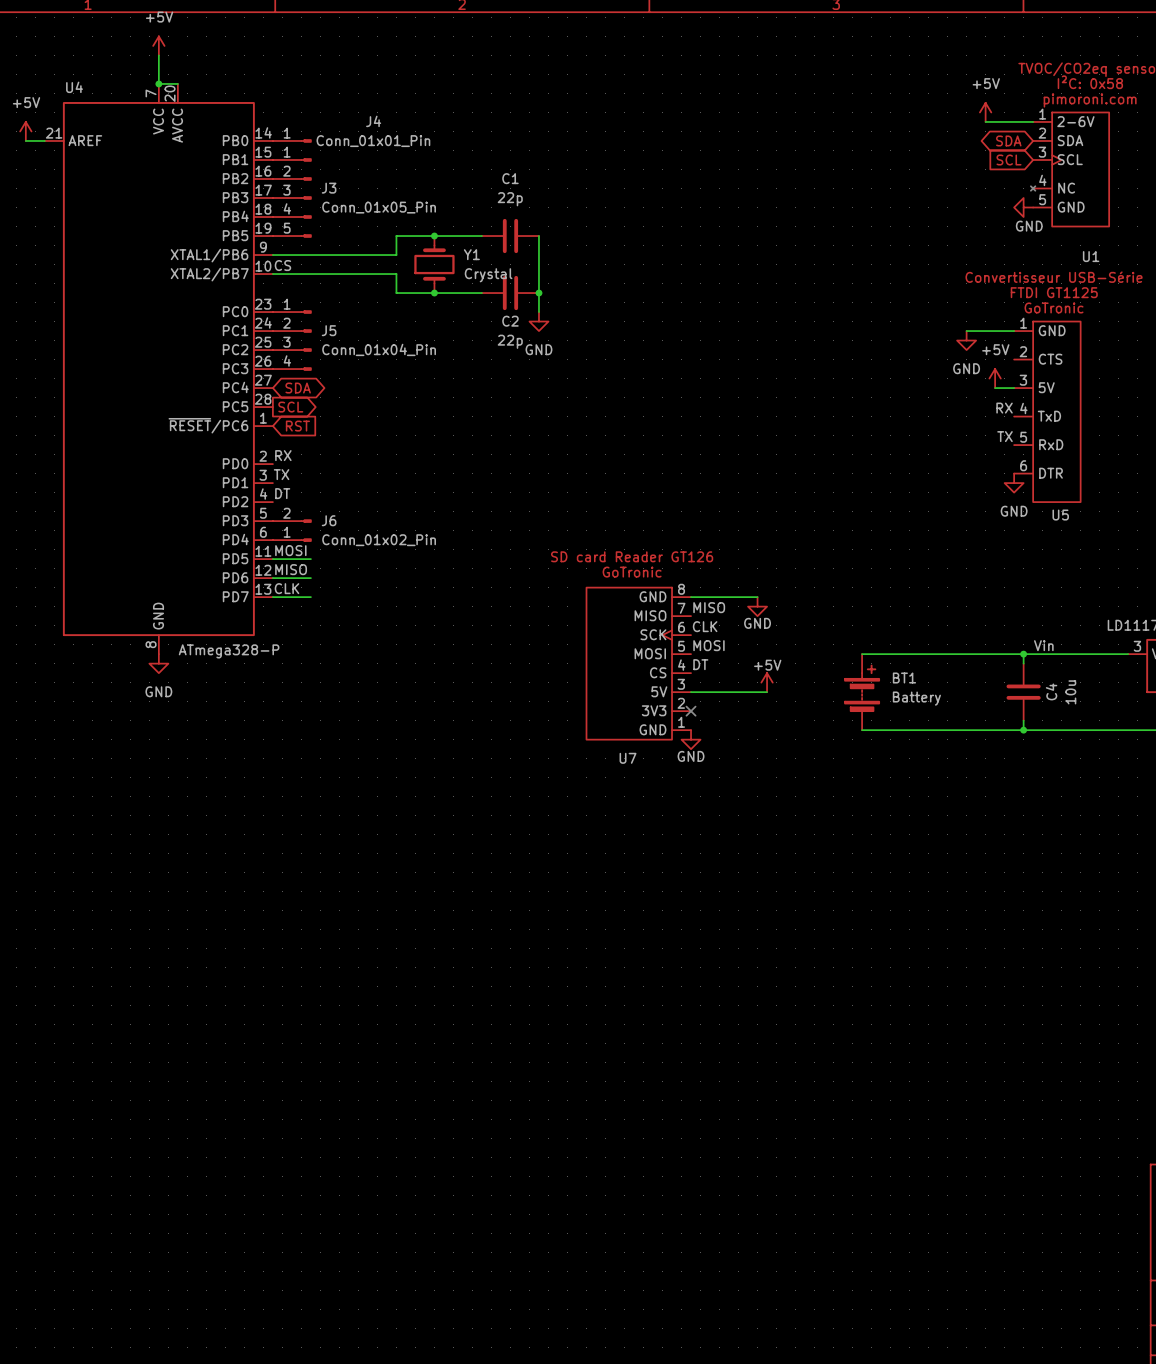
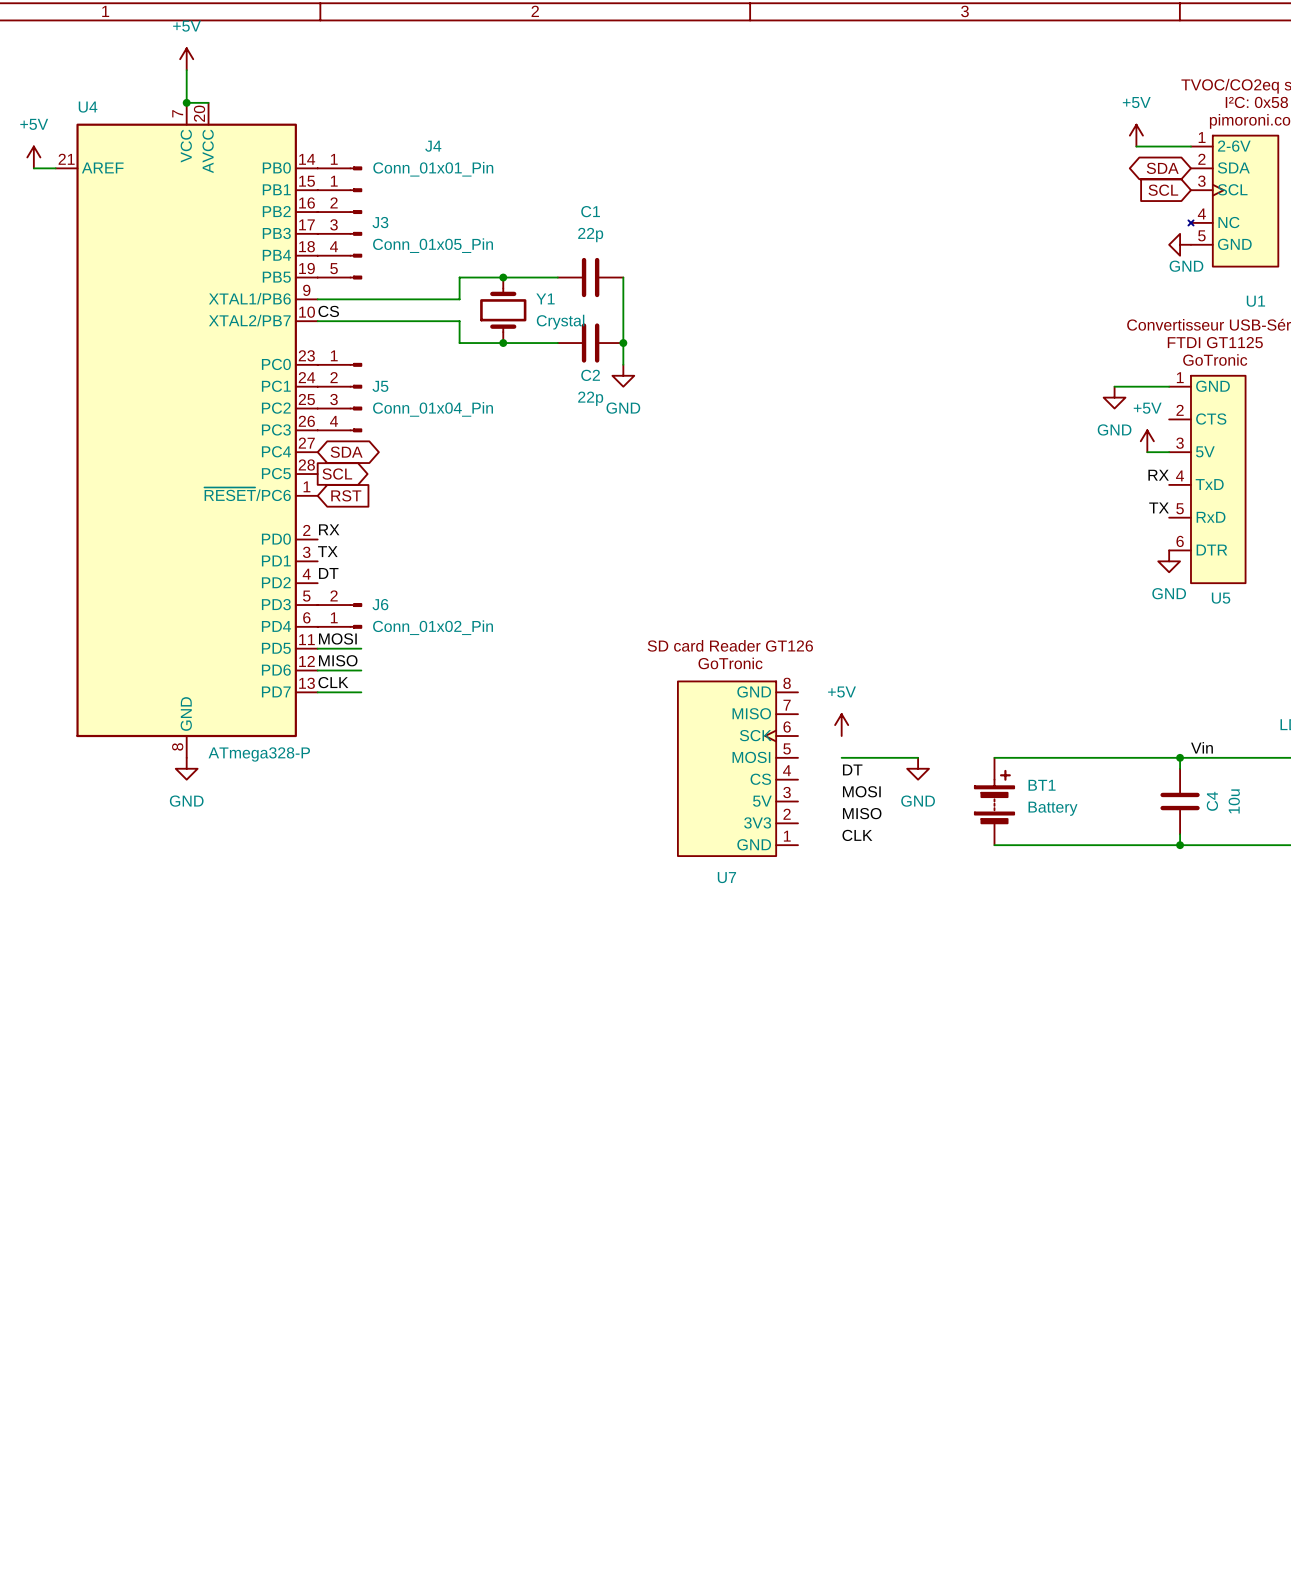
wire: (691, 597) (757, 597) -> (841, 757) (918, 757)
power symbol: GND (757, 606) -> none
label position: MISO (709, 607) -> MISO (862, 813)
label position: CLK (705, 626) -> CLK (857, 835)
label position: MOSI (708, 645) -> MOSI (861, 791)
power symbol: none -> GND (918, 768)
label position: DT (700, 664) -> DT (852, 769)
power symbol text position: +5V (767, 665) -> +5V (842, 692)
power symbol position: +5V (767, 682) -> +5V (841, 725)
wire: (691, 692) (767, 692) -> none
no-connect mark: (691, 711) -> none
power symbol: GND (691, 739) -> none

